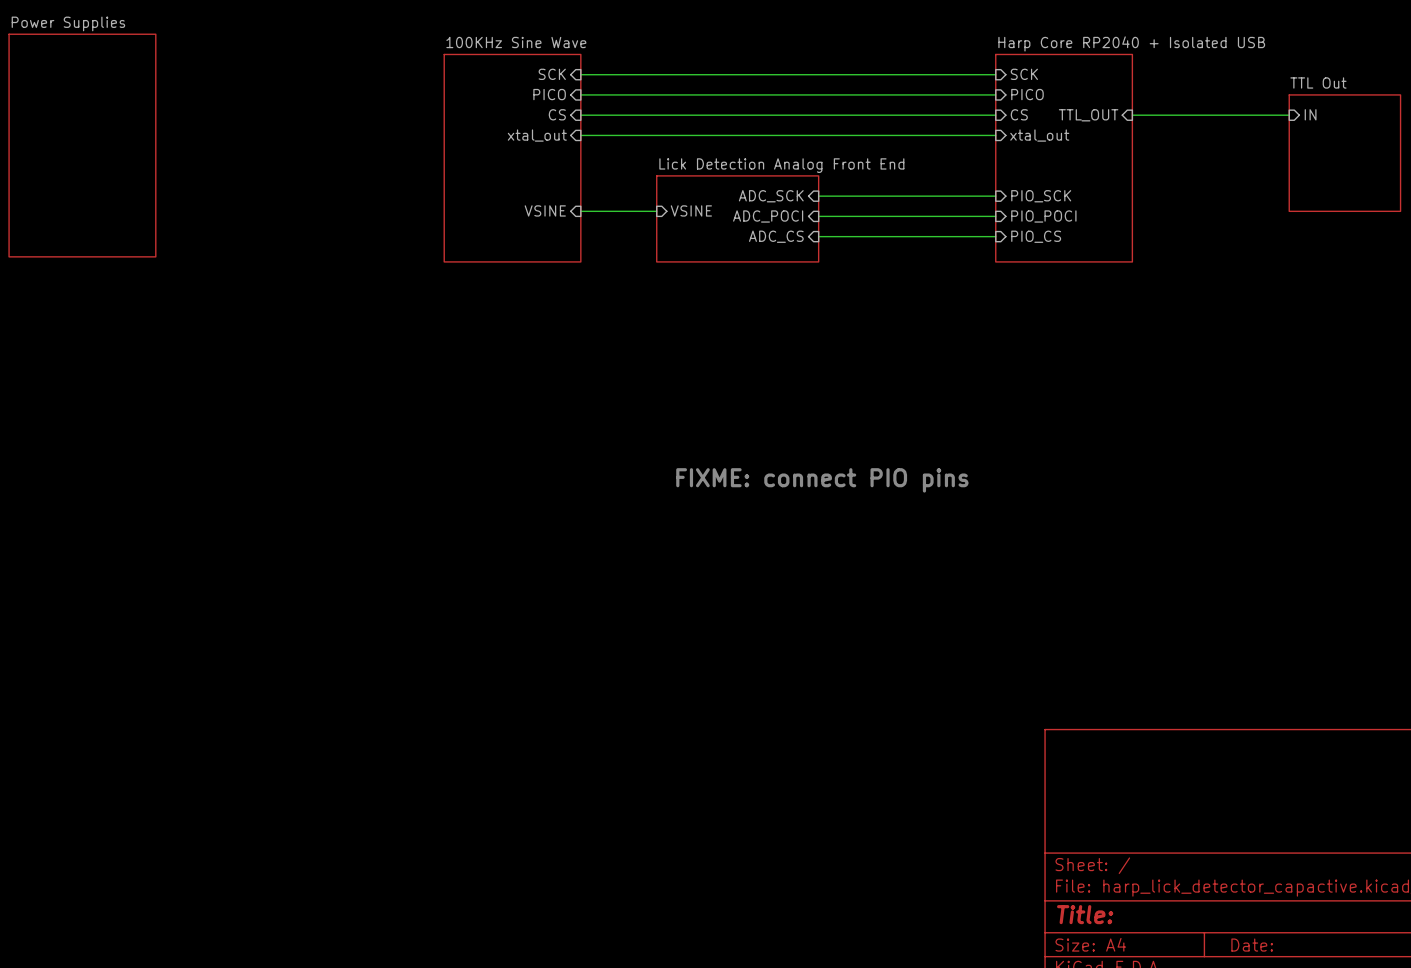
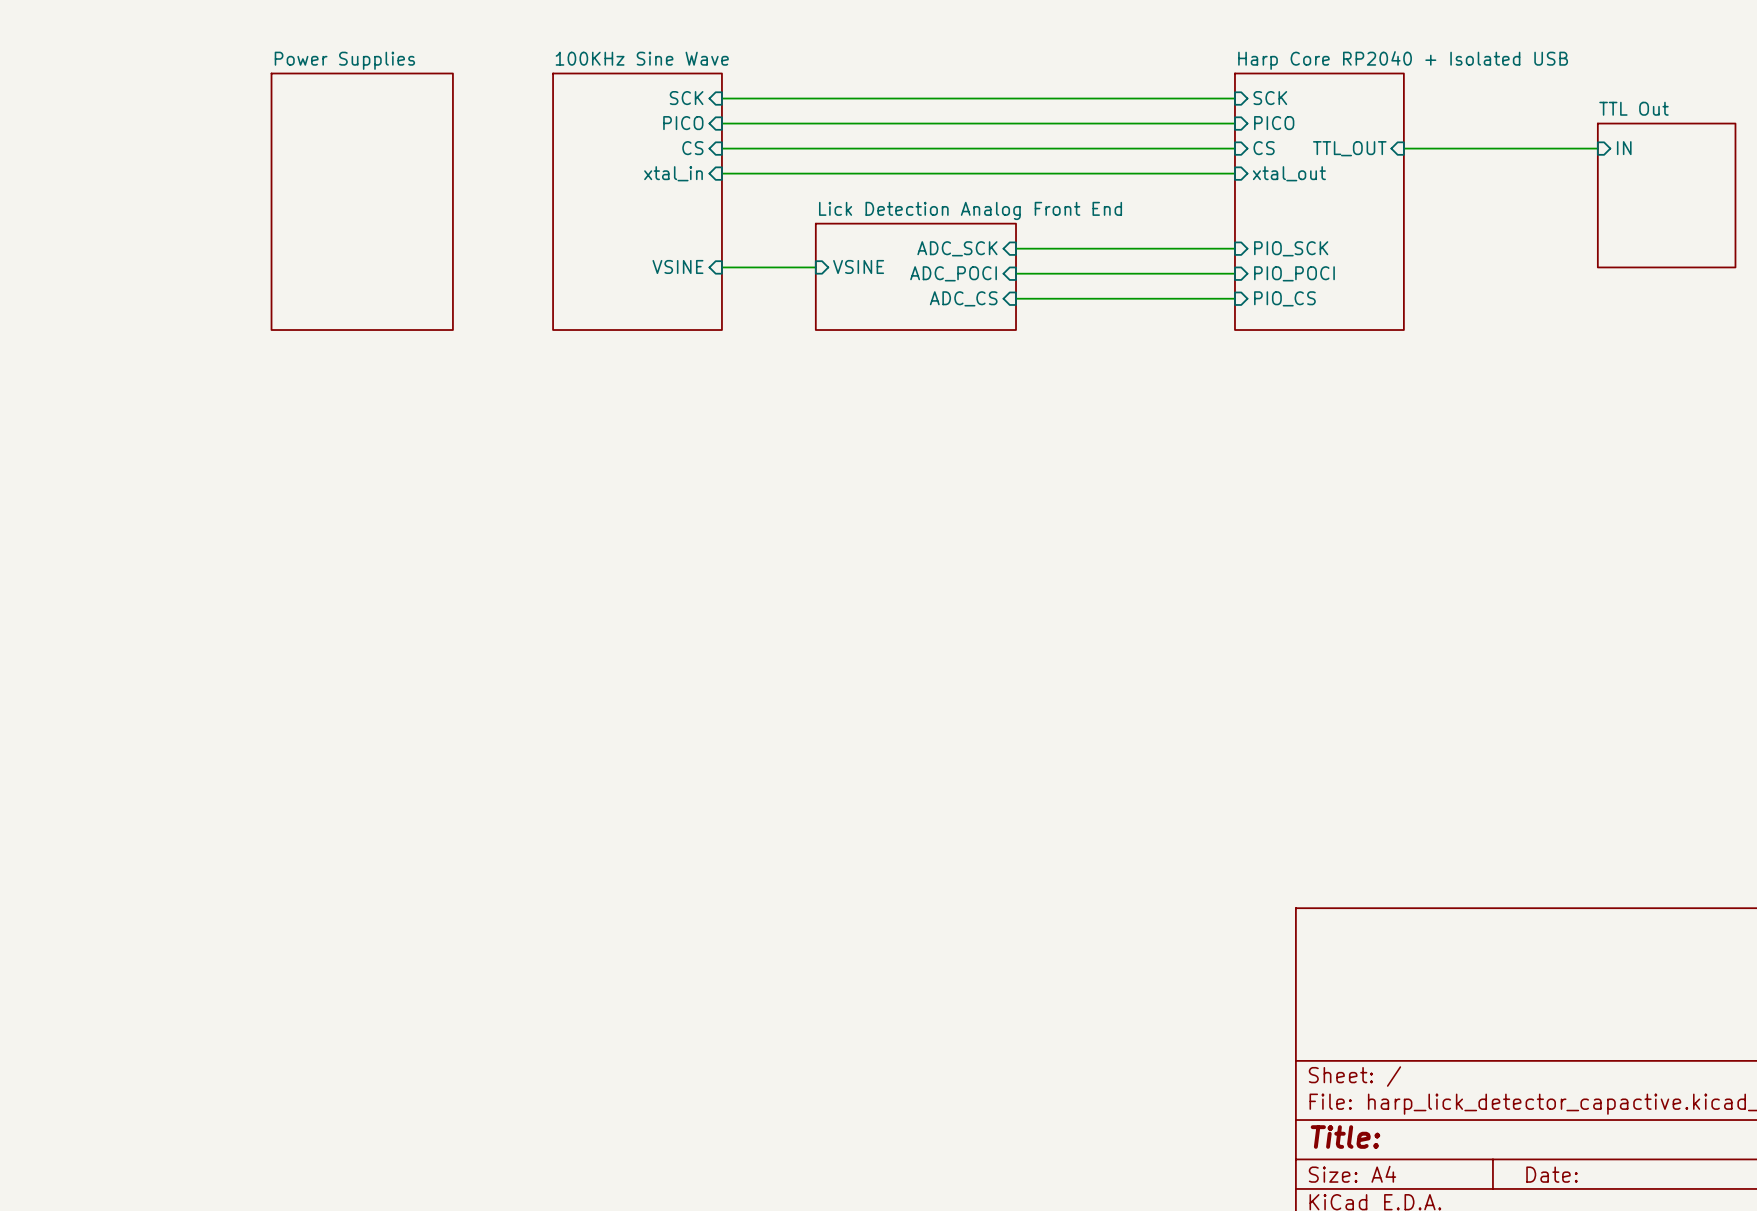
sheet pin: xtal_out (537, 135) -> xtal_in (673, 173)
sheet Power Supplies: (82, 145) -> none
sheet Power Supplies: none -> (362, 201)
text: FIXME: connect PIO pins (822, 480) -> none

